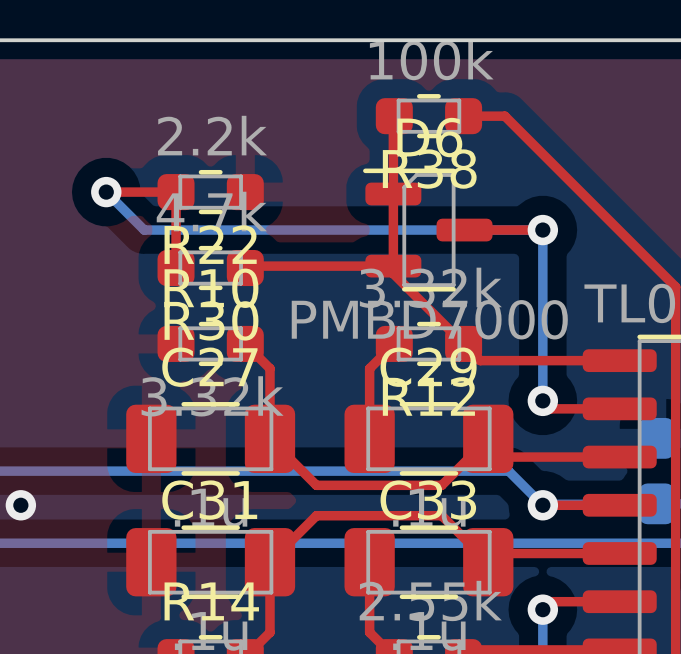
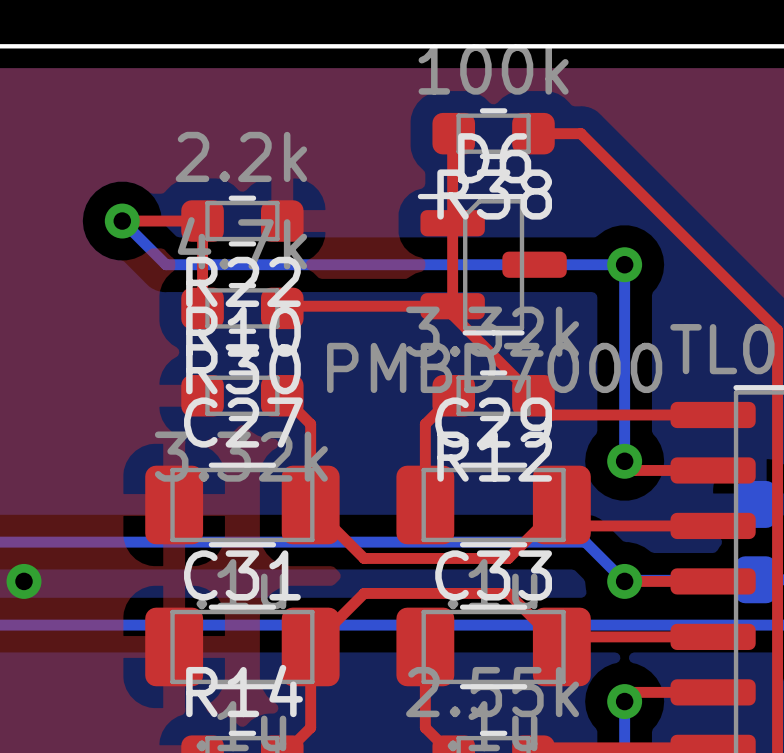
top track: (464, 230) (542, 230) -> none

